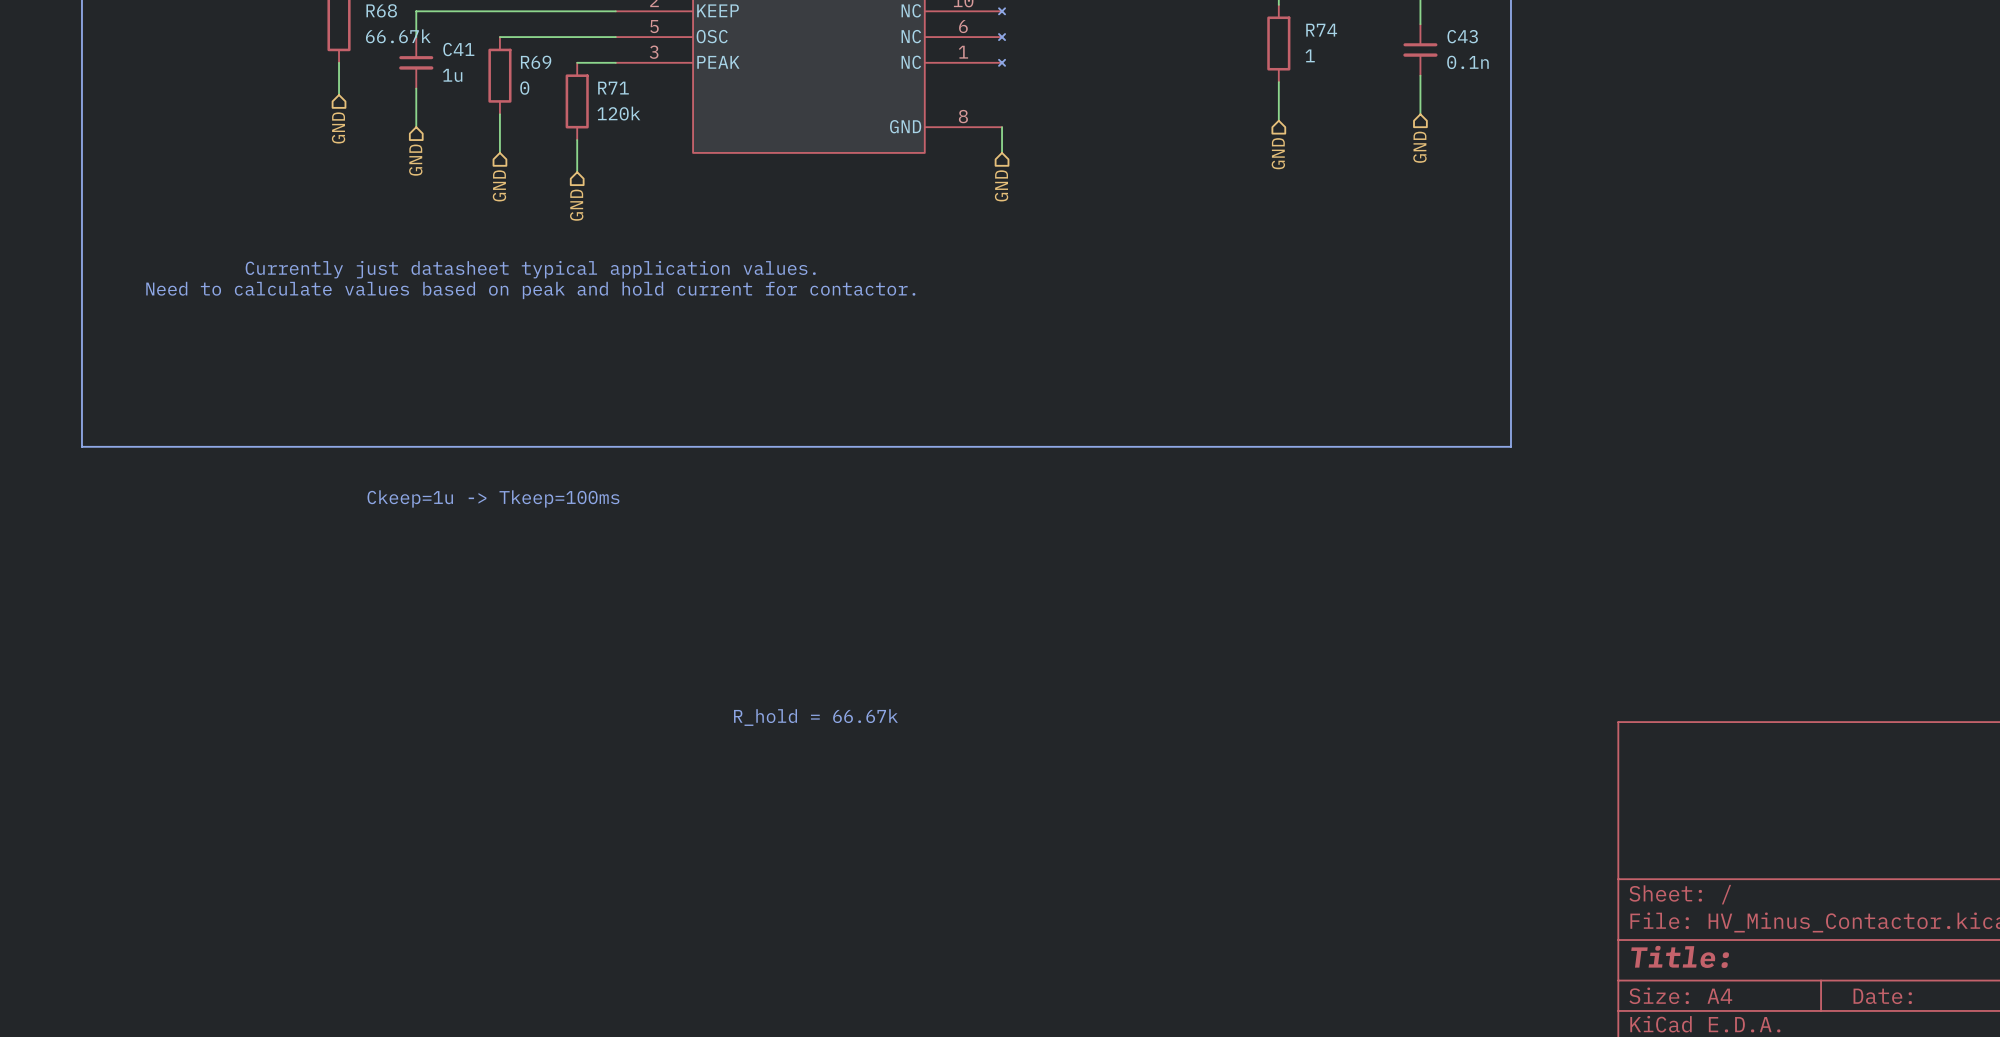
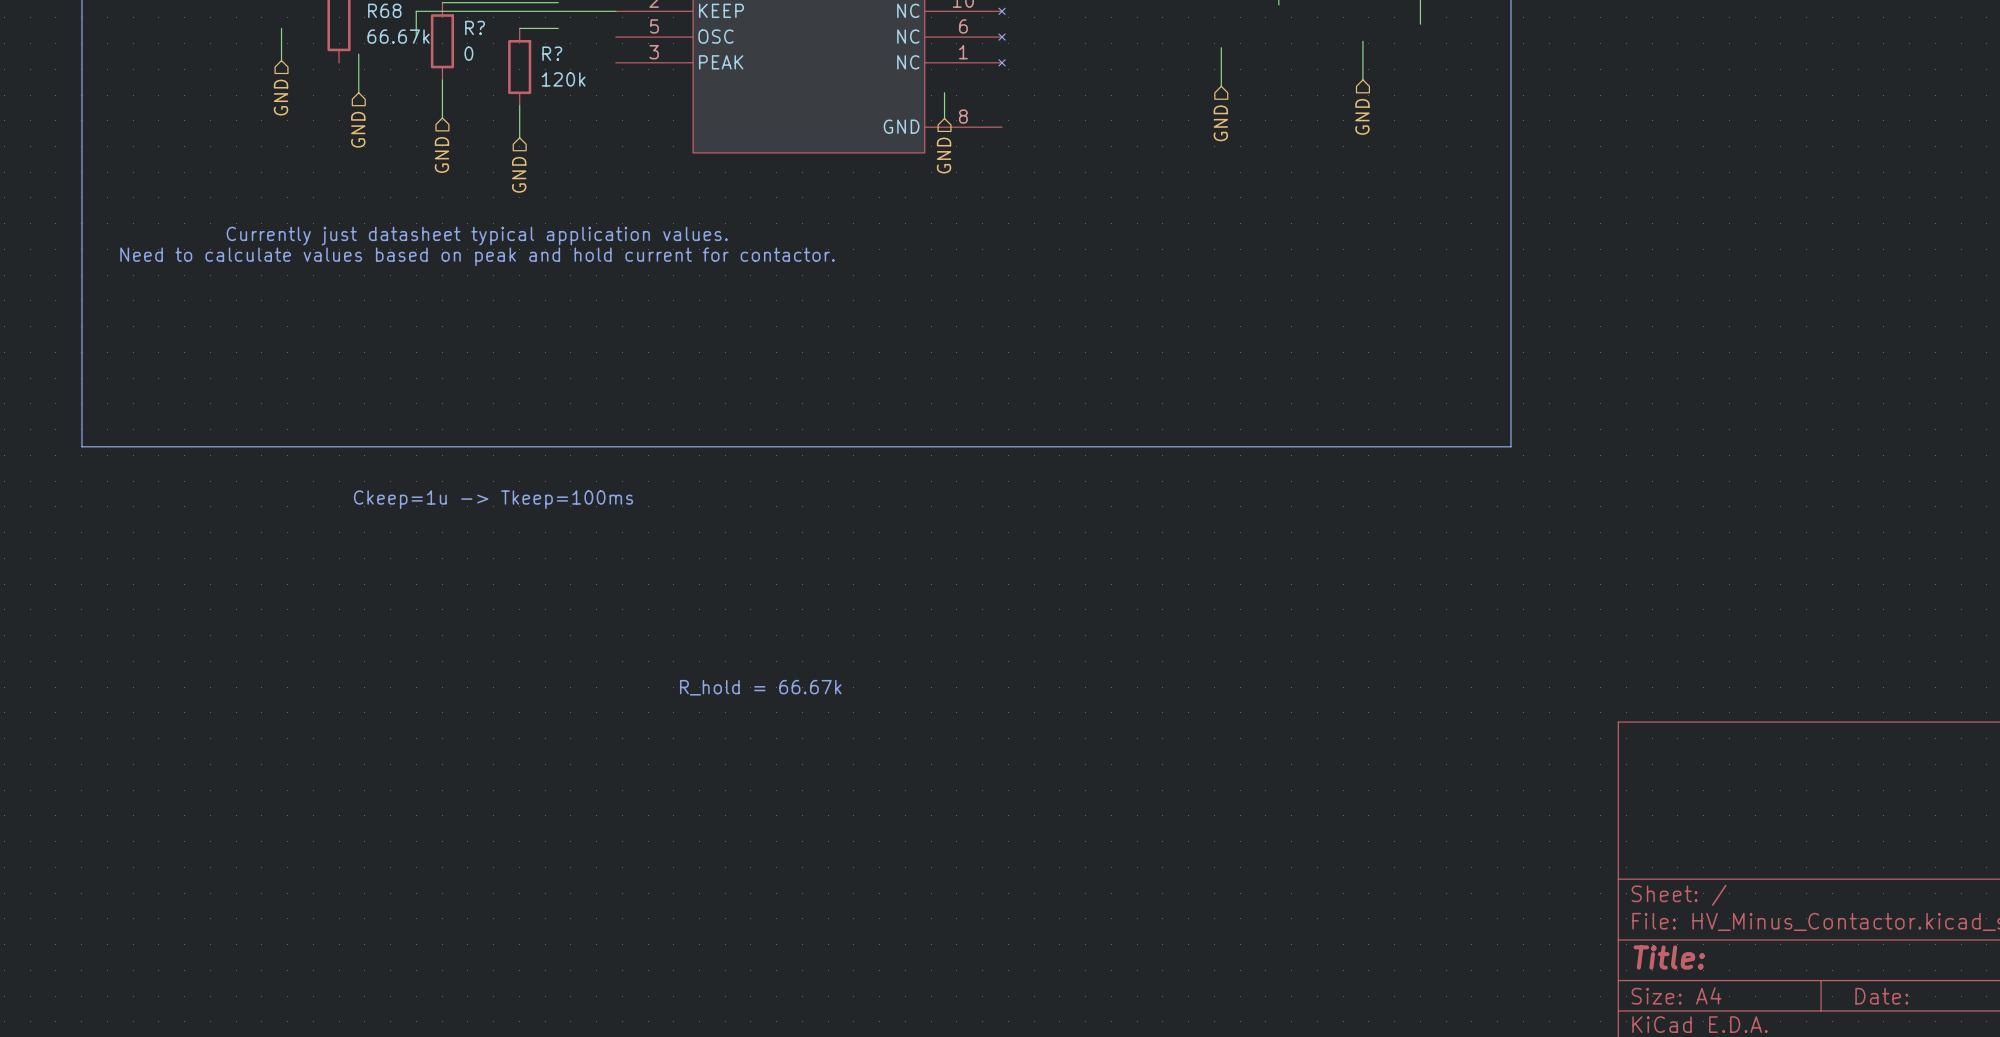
wire: (499, 37) (615, 37) -> (442, 2) (558, 2)
R?: none -> 0 (442, 41)
R74: 1 (1278, 43) -> none
C43: 0.1n (1420, 49) -> none
wire: (339, 62) (339, 95) -> (281, 28) (281, 60)
C41: 1u (416, 62) -> none
wire: (577, 62) (615, 62) -> (519, 28) (558, 28)
R?: none -> 120k (519, 67)
R69: 0 (499, 75) -> none
wire: (1420, 75) (1420, 114) -> (1362, 41) (1362, 79)
wire: none -> (442, 79) (442, 117)
wire: (1278, 82) (1278, 120) -> (1221, 47) (1221, 86)
wire: (416, 88) (416, 127) -> (358, 54) (358, 92)
hierarchical label: none -> GND (281, 97)
R71: 120k (577, 101) -> none
hierarchical label: none -> GND (1362, 116)
wire: (499, 114) (499, 152) -> none
hierarchical label: none -> GND (1220, 123)
hierarchical label position: GND (338, 127) -> GND (358, 129)
wire: (1002, 127) (1002, 152) -> (944, 92) (944, 118)
wire: (577, 140) (577, 172) -> (519, 105) (519, 137)
hierarchical label: GND (1419, 147) -> none
hierarchical label: GND (1278, 153) -> none
hierarchical label position: GND (415, 160) -> GND (441, 154)
hierarchical label position: GND (499, 185) -> GND (519, 174)
hierarchical label position: GND (1001, 185) -> GND (944, 155)
hierarchical label: GND (576, 205) -> none
text position: Currently just datasheet typical application values. (530, 269) -> Currently just datasheet typical application values. (477, 236)
text position: Need to calculate values based on peak and hold current for contactor. (530, 290) -> Need to calculate values based on peak and hold current for contactor. (477, 256)
text position: R_hold = 66.67k (815, 717) -> R_hold = 66.67k (760, 687)

